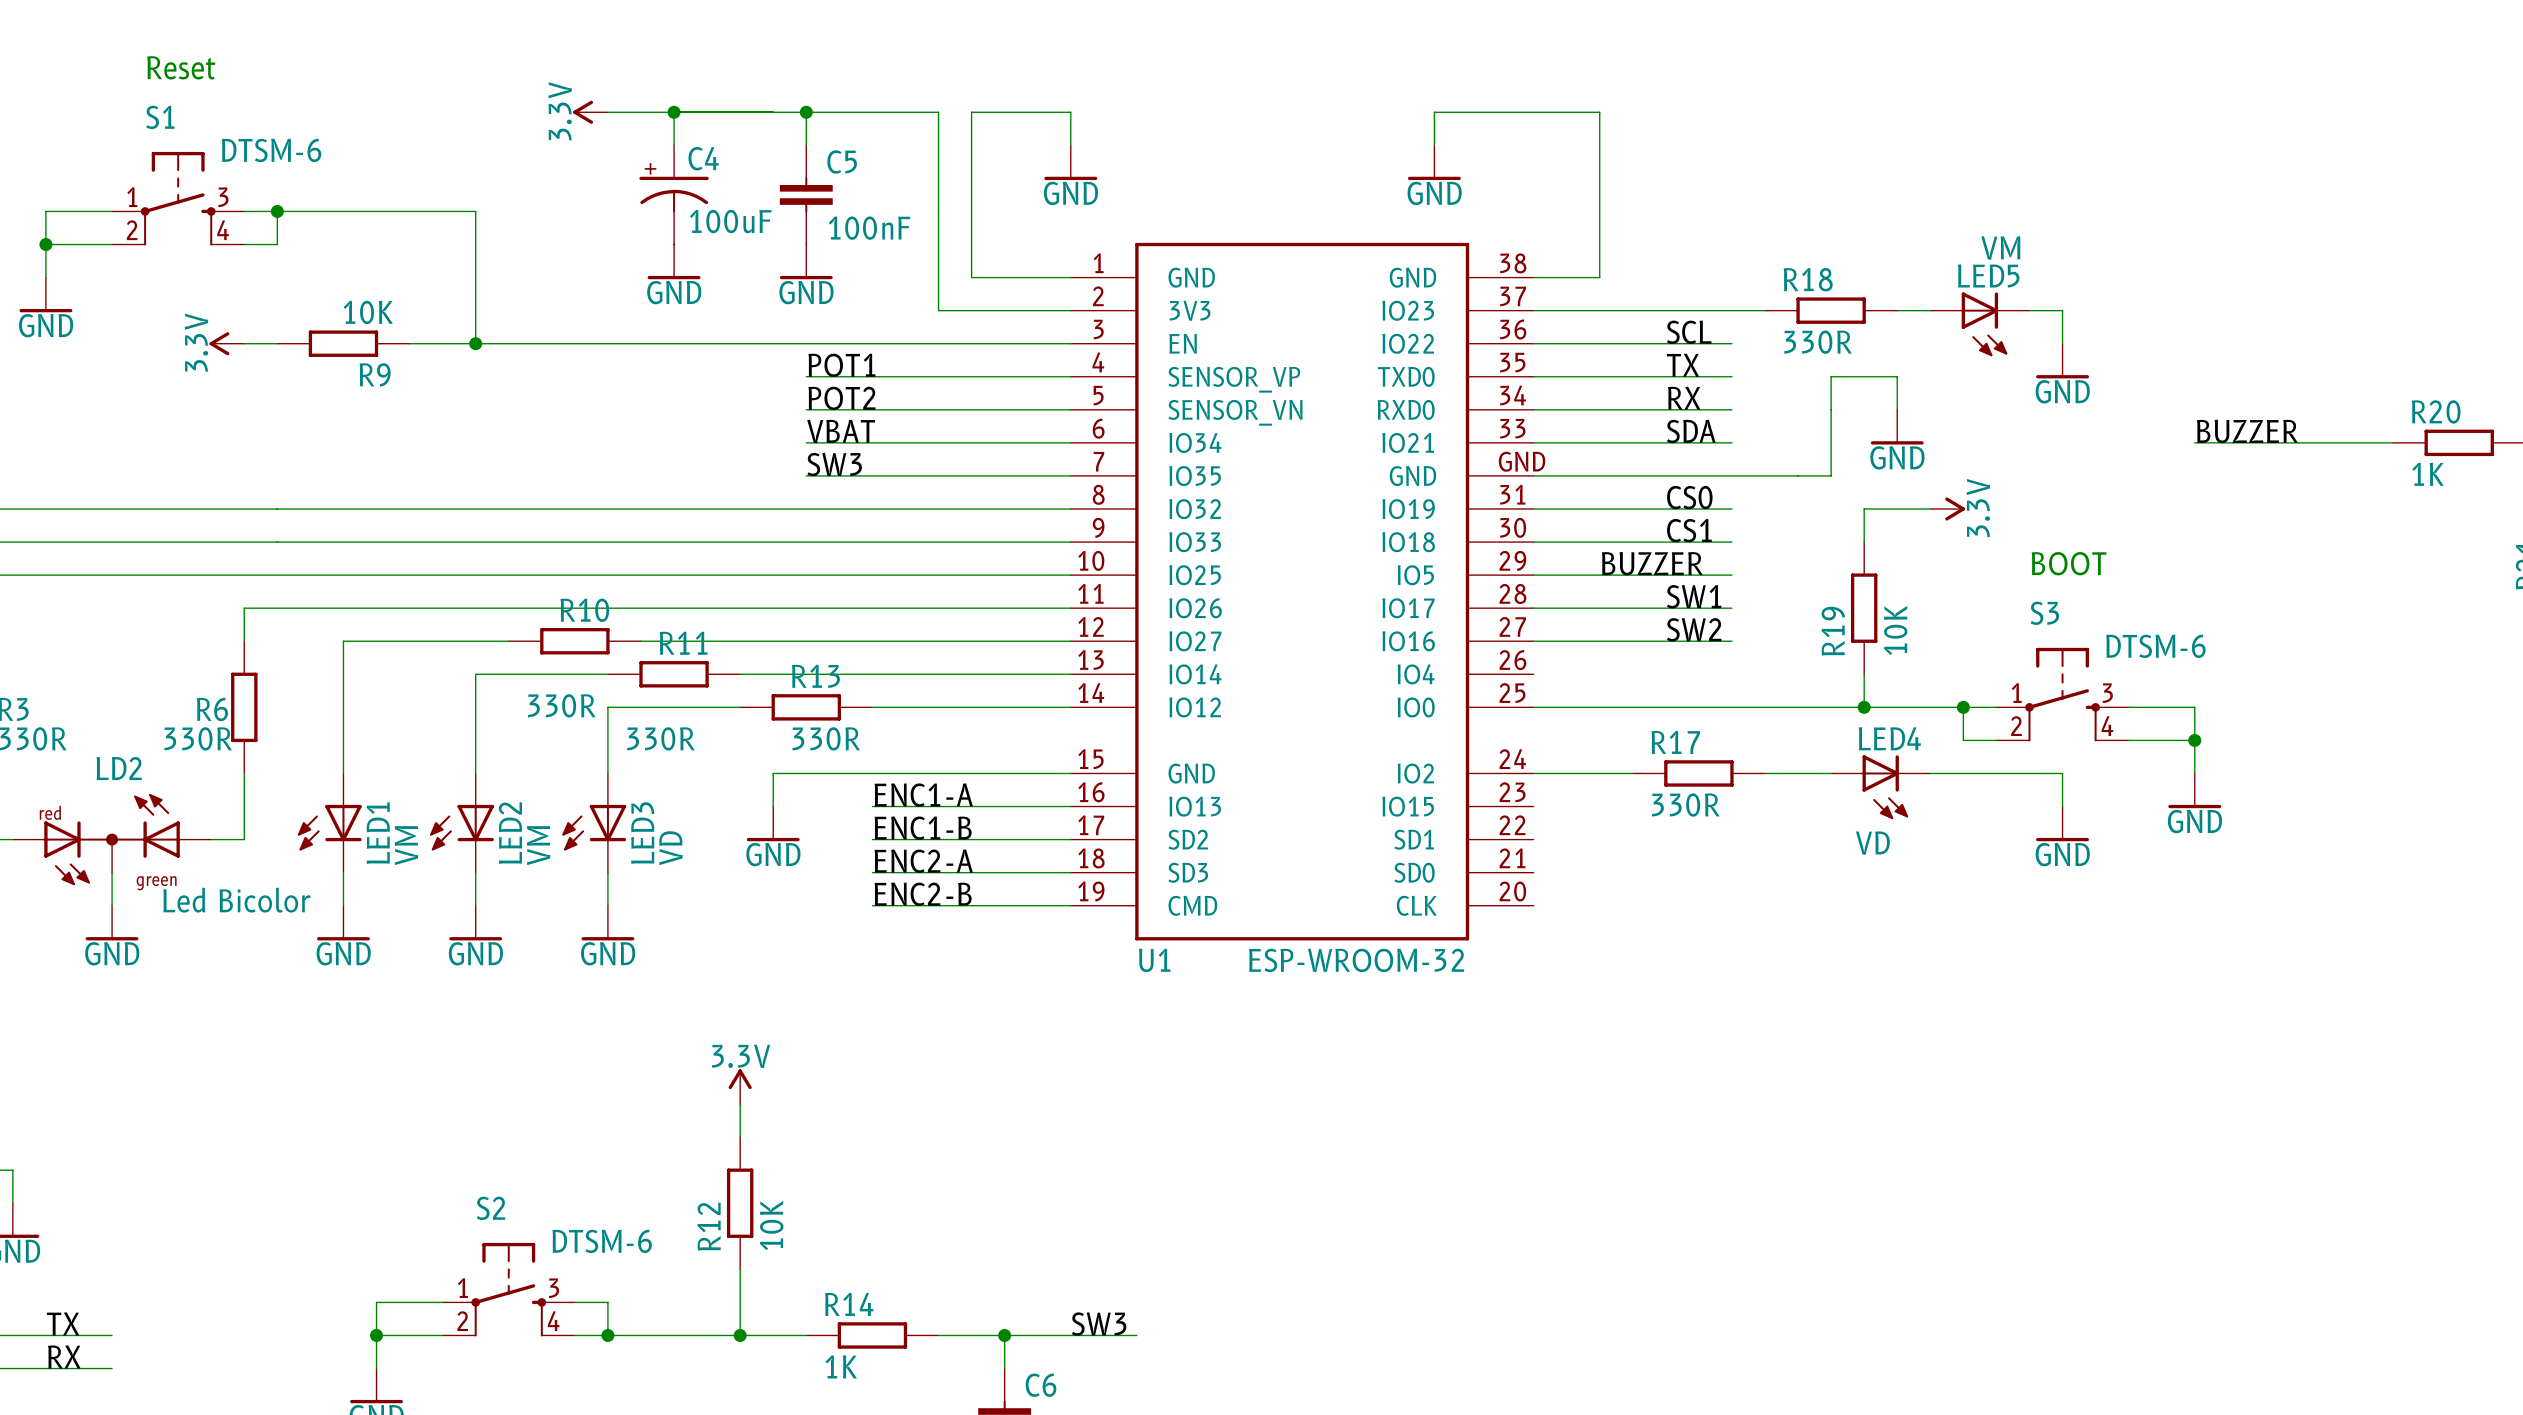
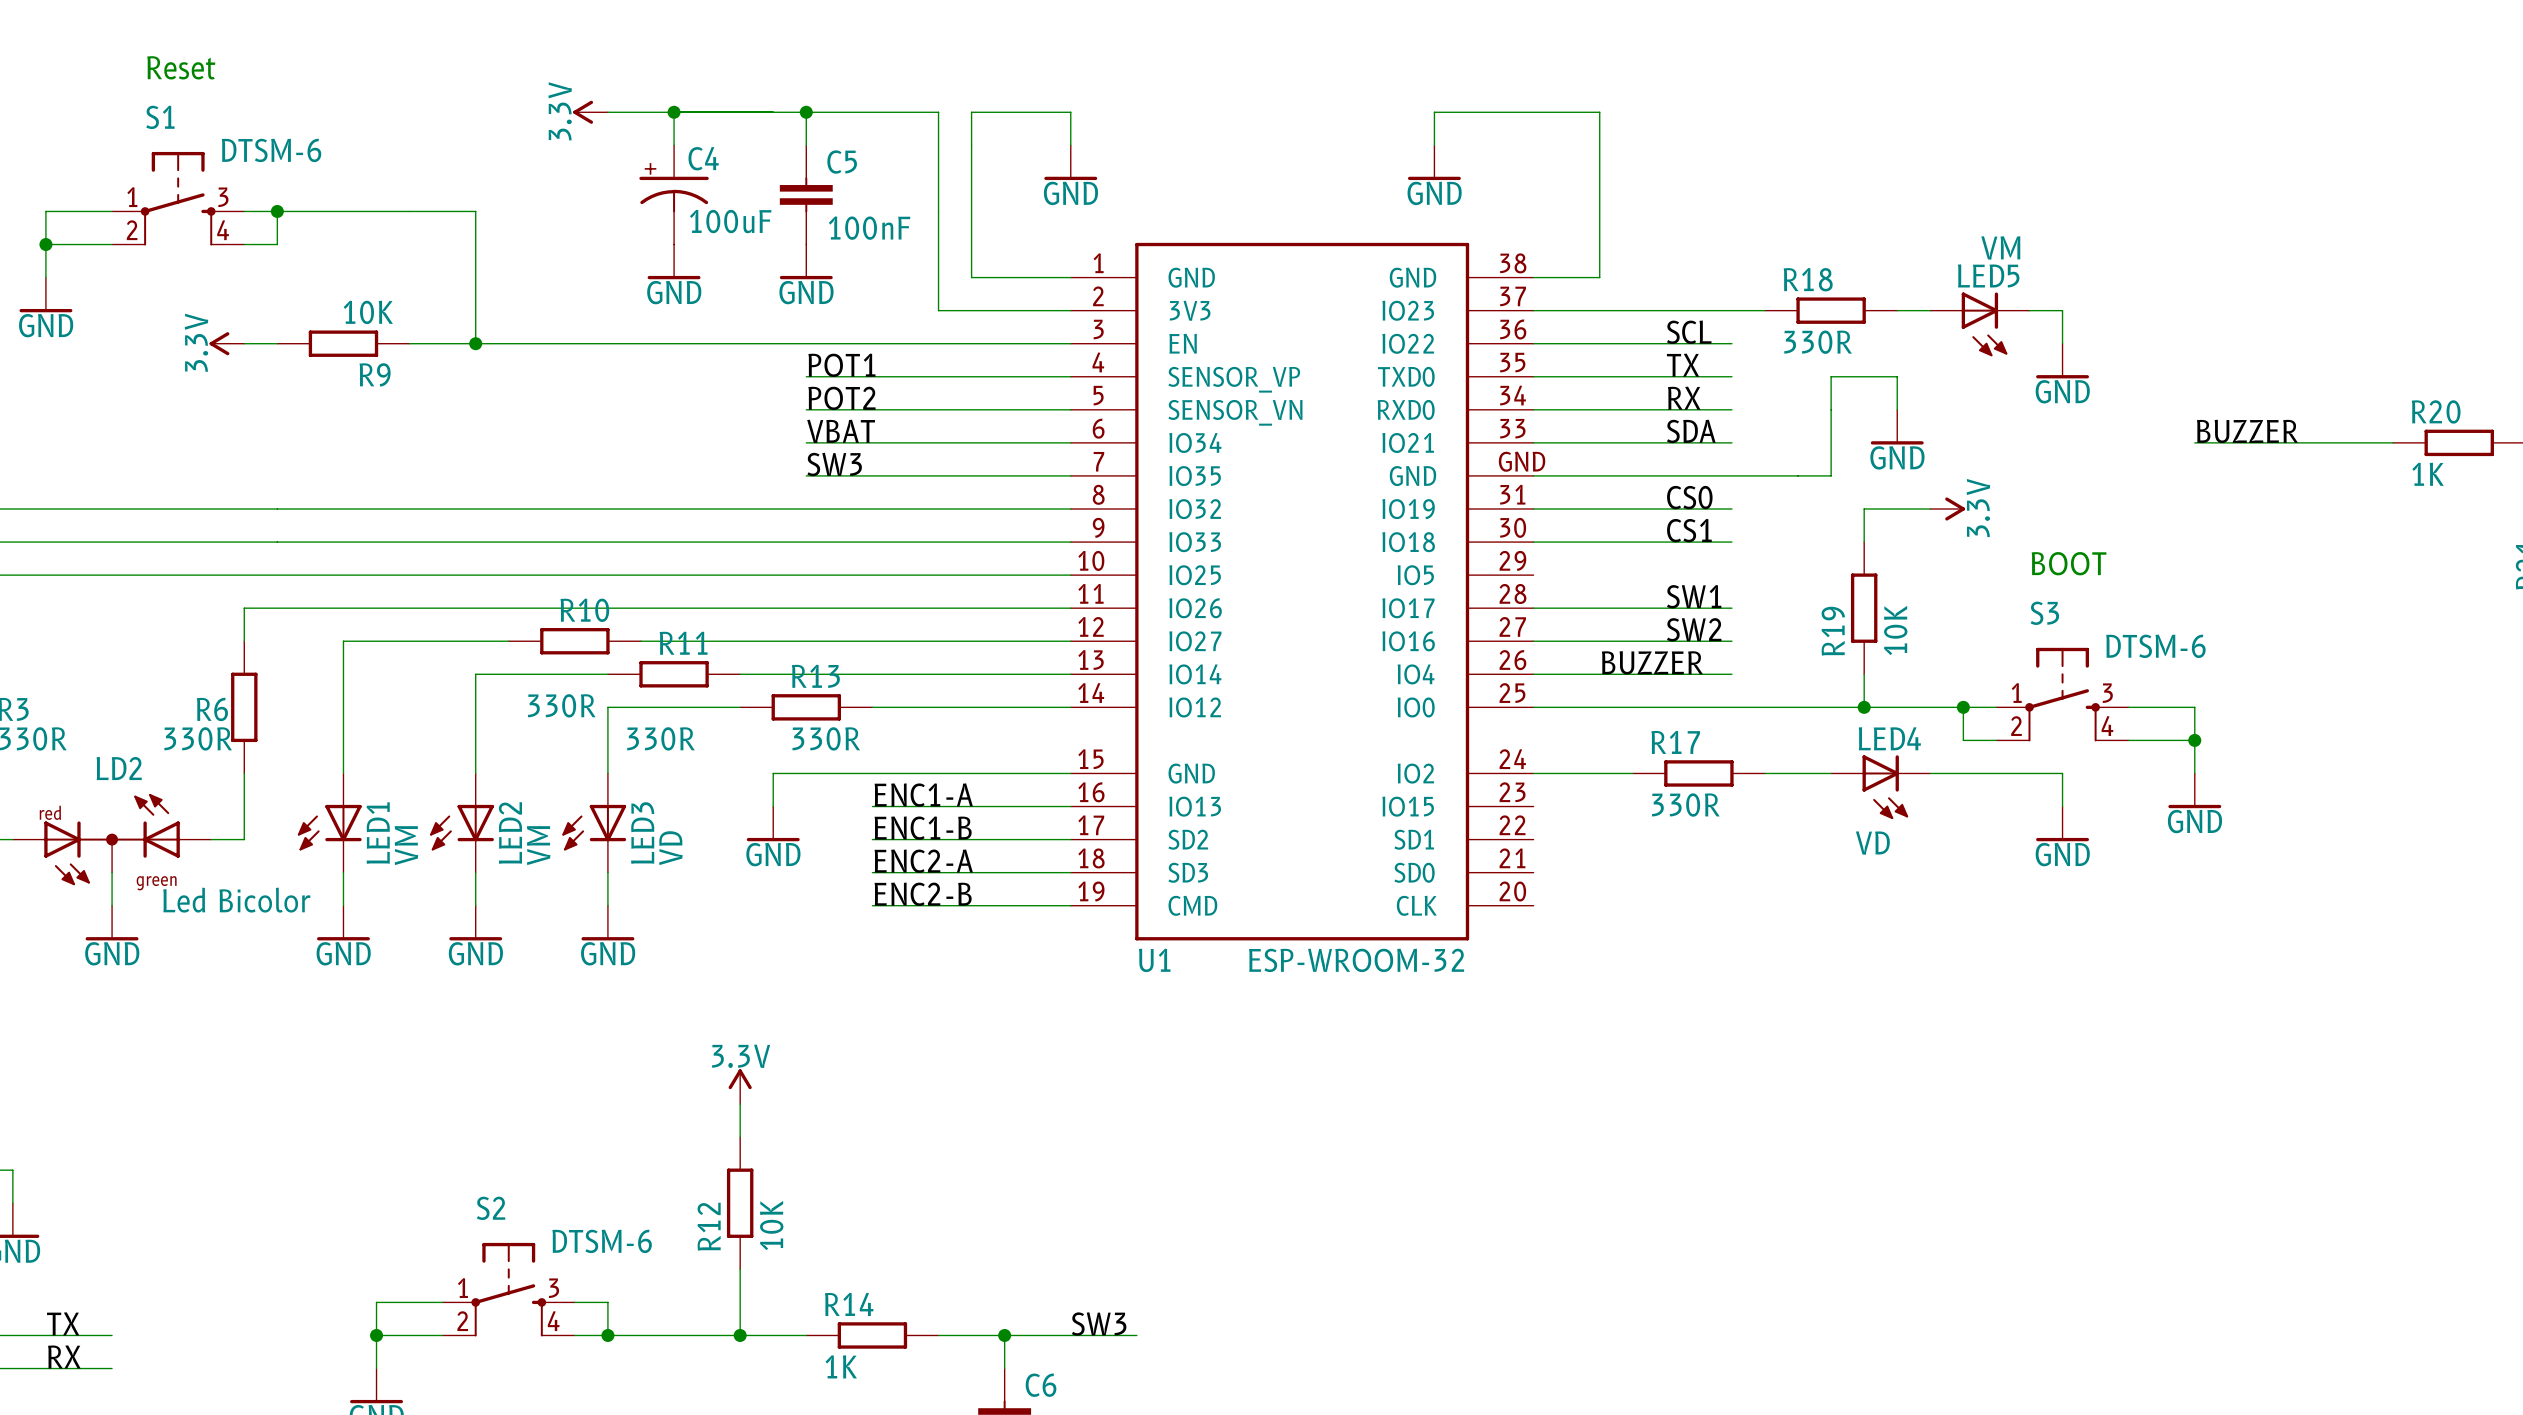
label position: BUZZER (1652, 563) -> BUZZER (1652, 662)
wire: (1533, 575) (1731, 575) -> (1533, 674) (1731, 674)

